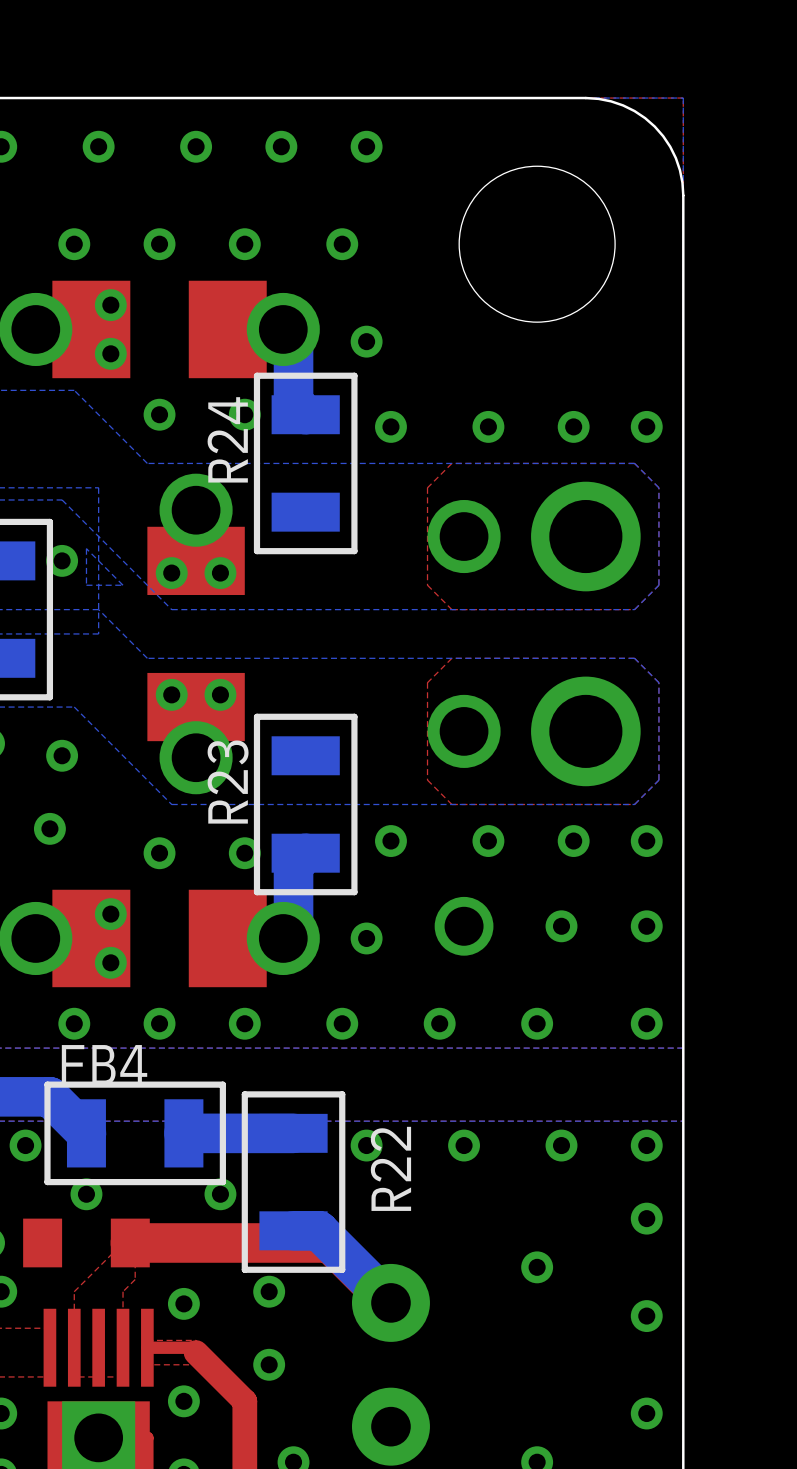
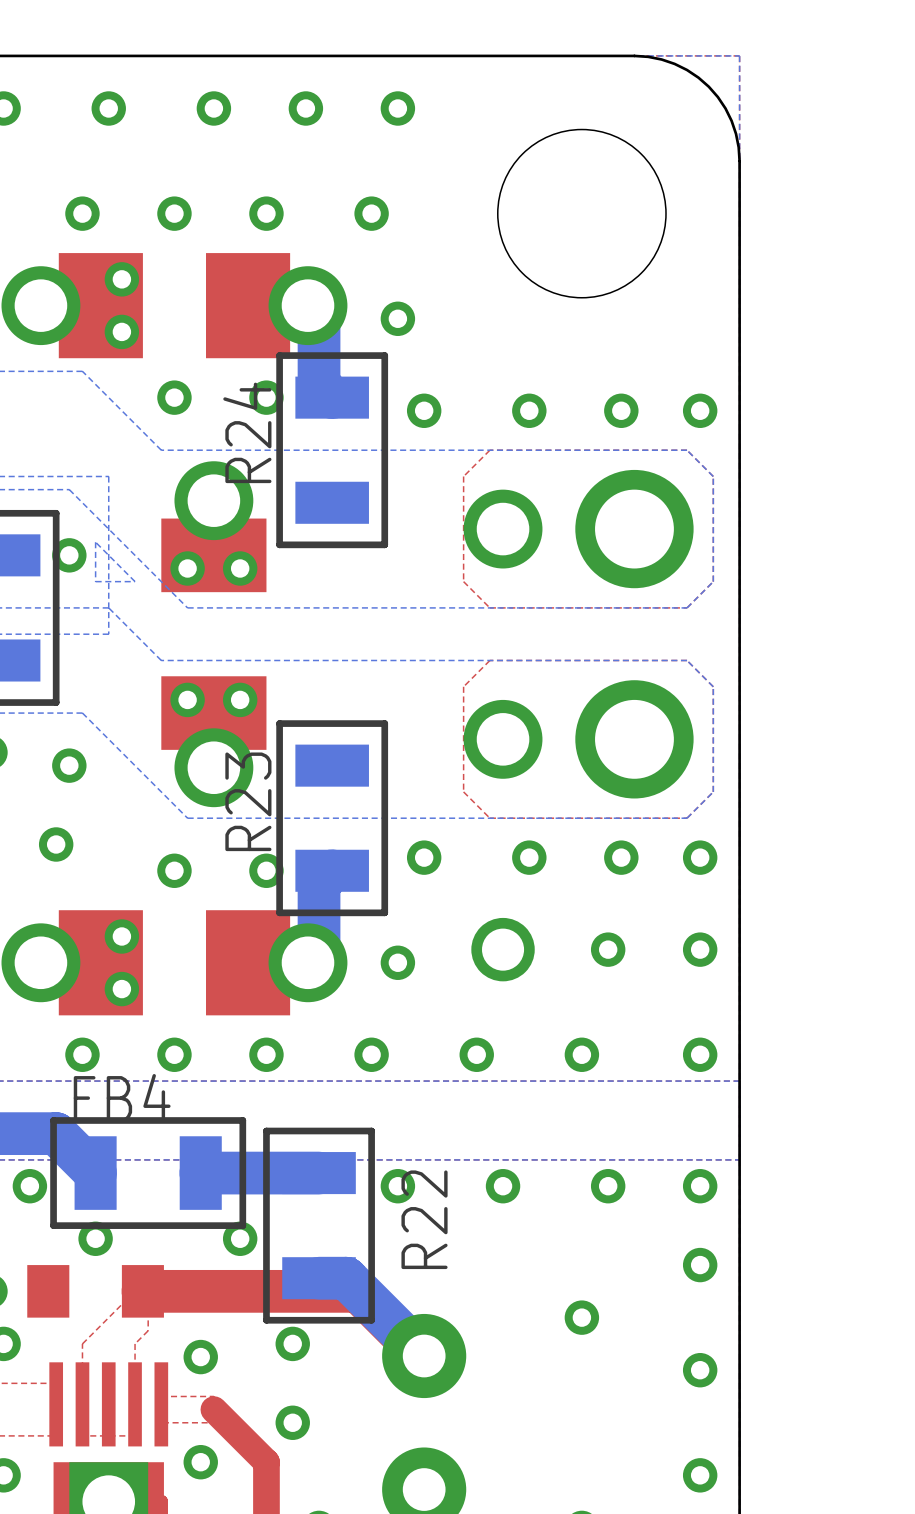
top track: (147, 1347) (191, 1347) (196, 1352) -> none

